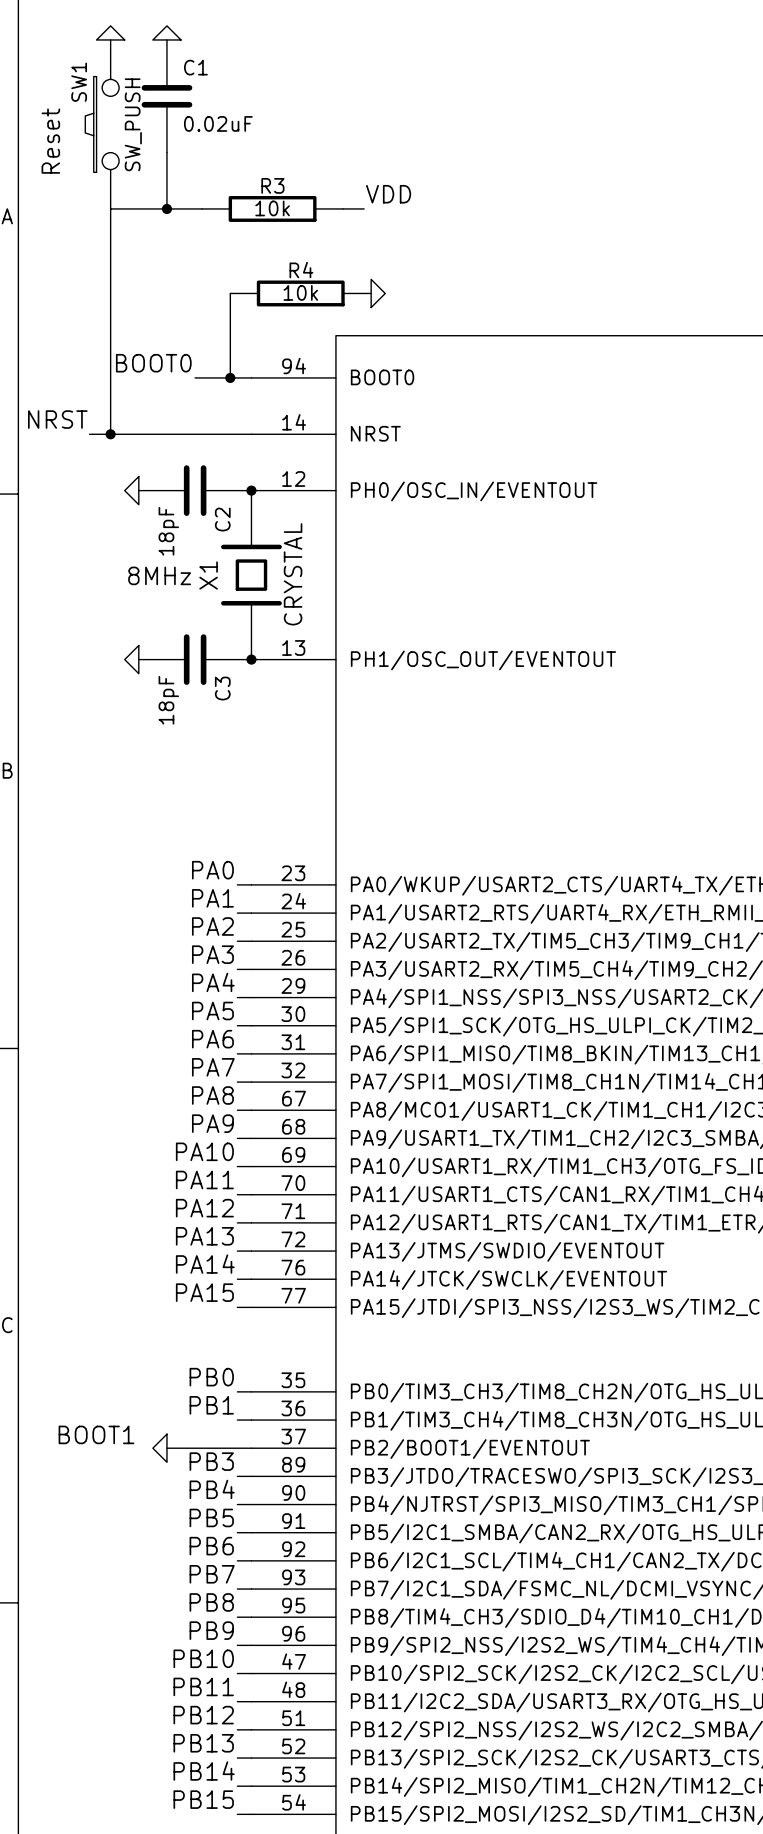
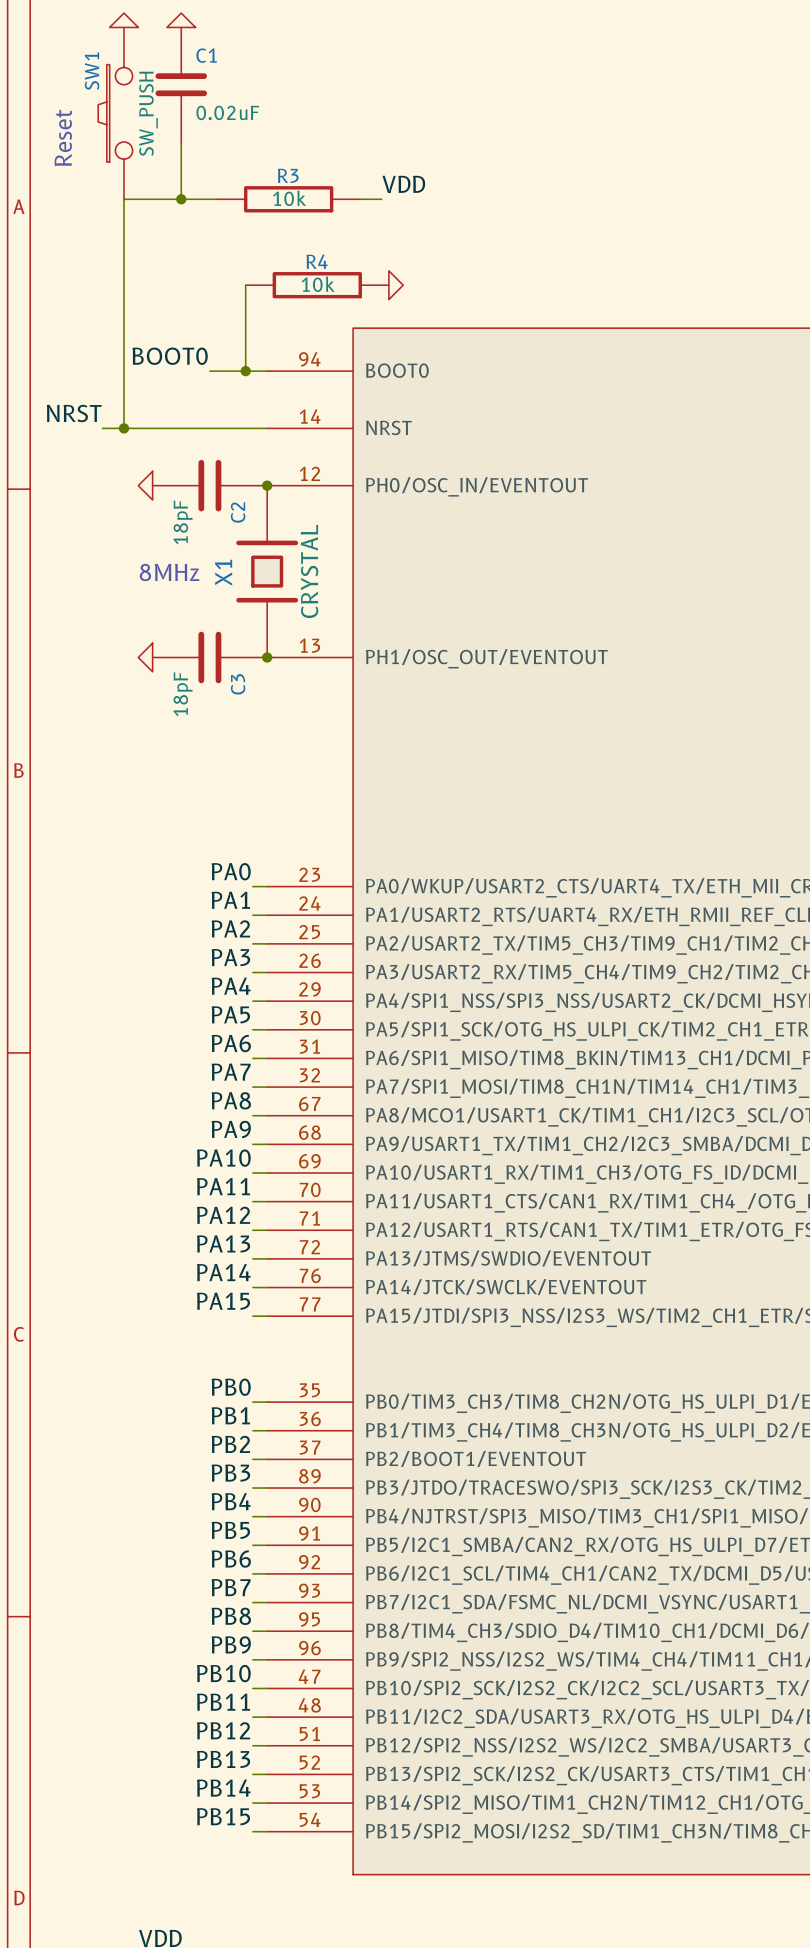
label: none -> PB2 (230, 1444)
text: BOOT1 (96, 1434) -> none
power symbol: (159, 1448) -> none
wire: (166, 1448) (237, 1448) -> none

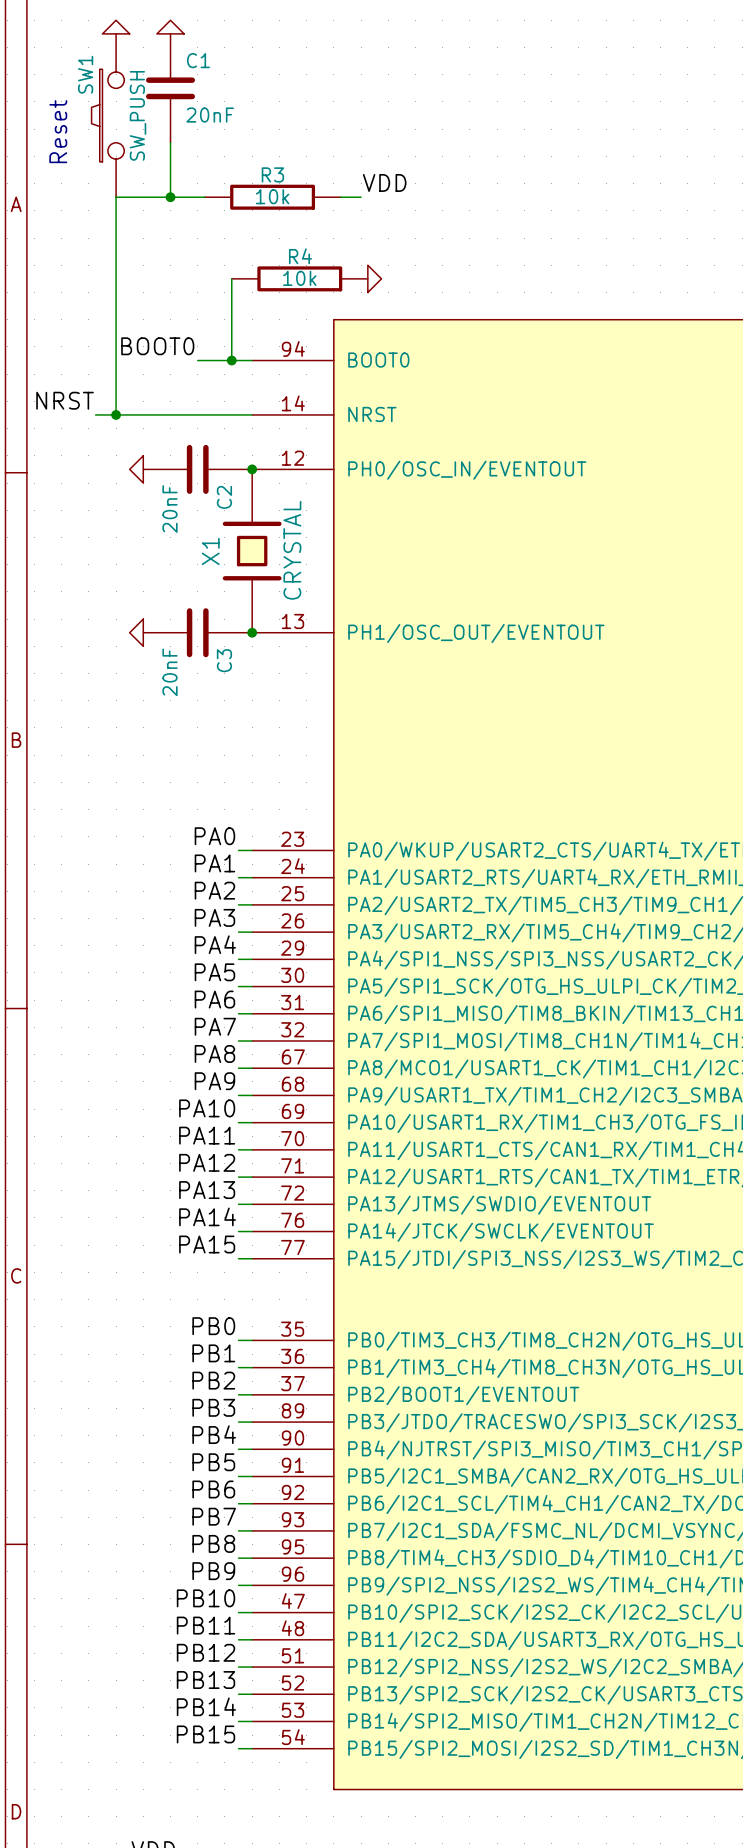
C1 value: 0.02uF (227, 112) -> 20nF (210, 115)
C2 value: 18pF (183, 522) -> 20nF (170, 509)
text: 8MHz (169, 572) -> none
C3 value: 18pF (183, 694) -> 20nF (170, 672)

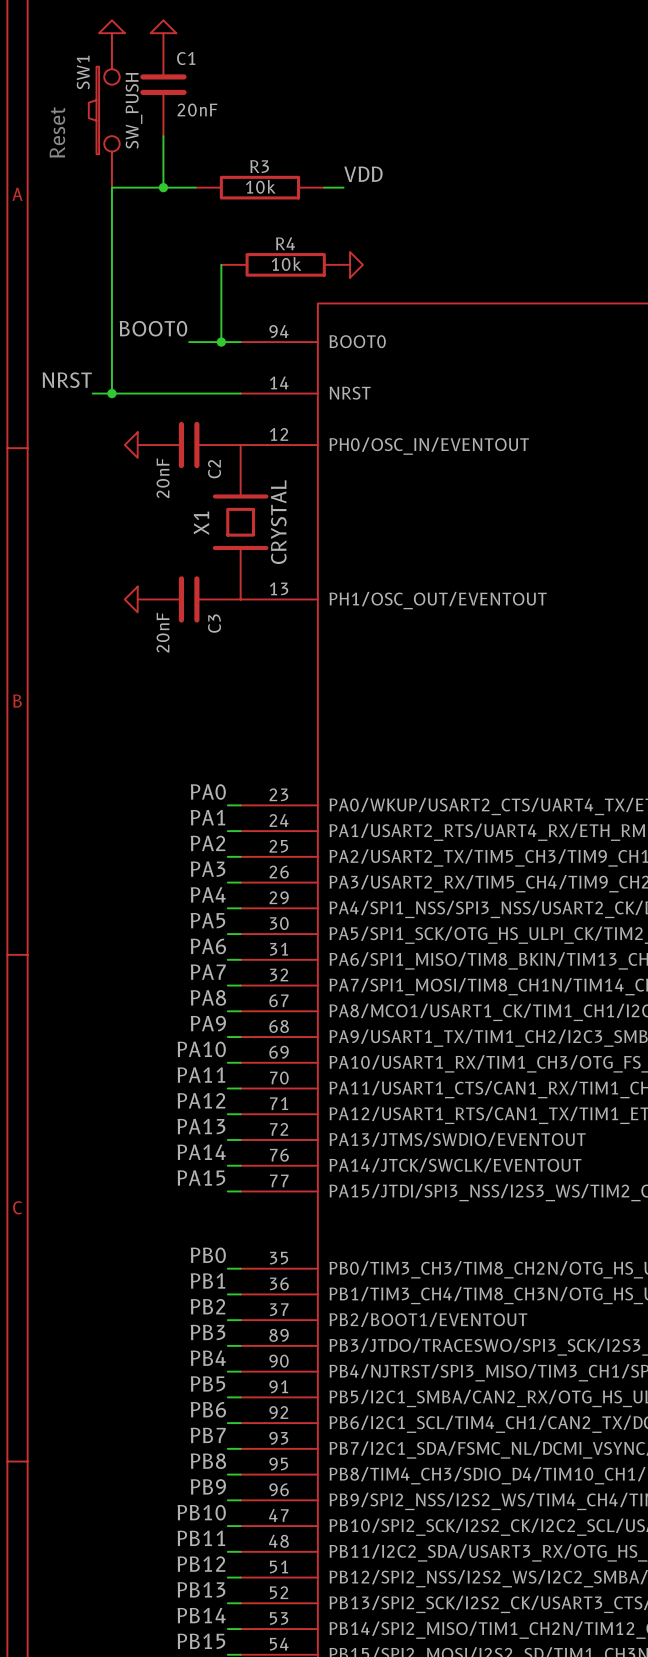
junction: (252, 469) -> none
junction: (252, 632) -> none

